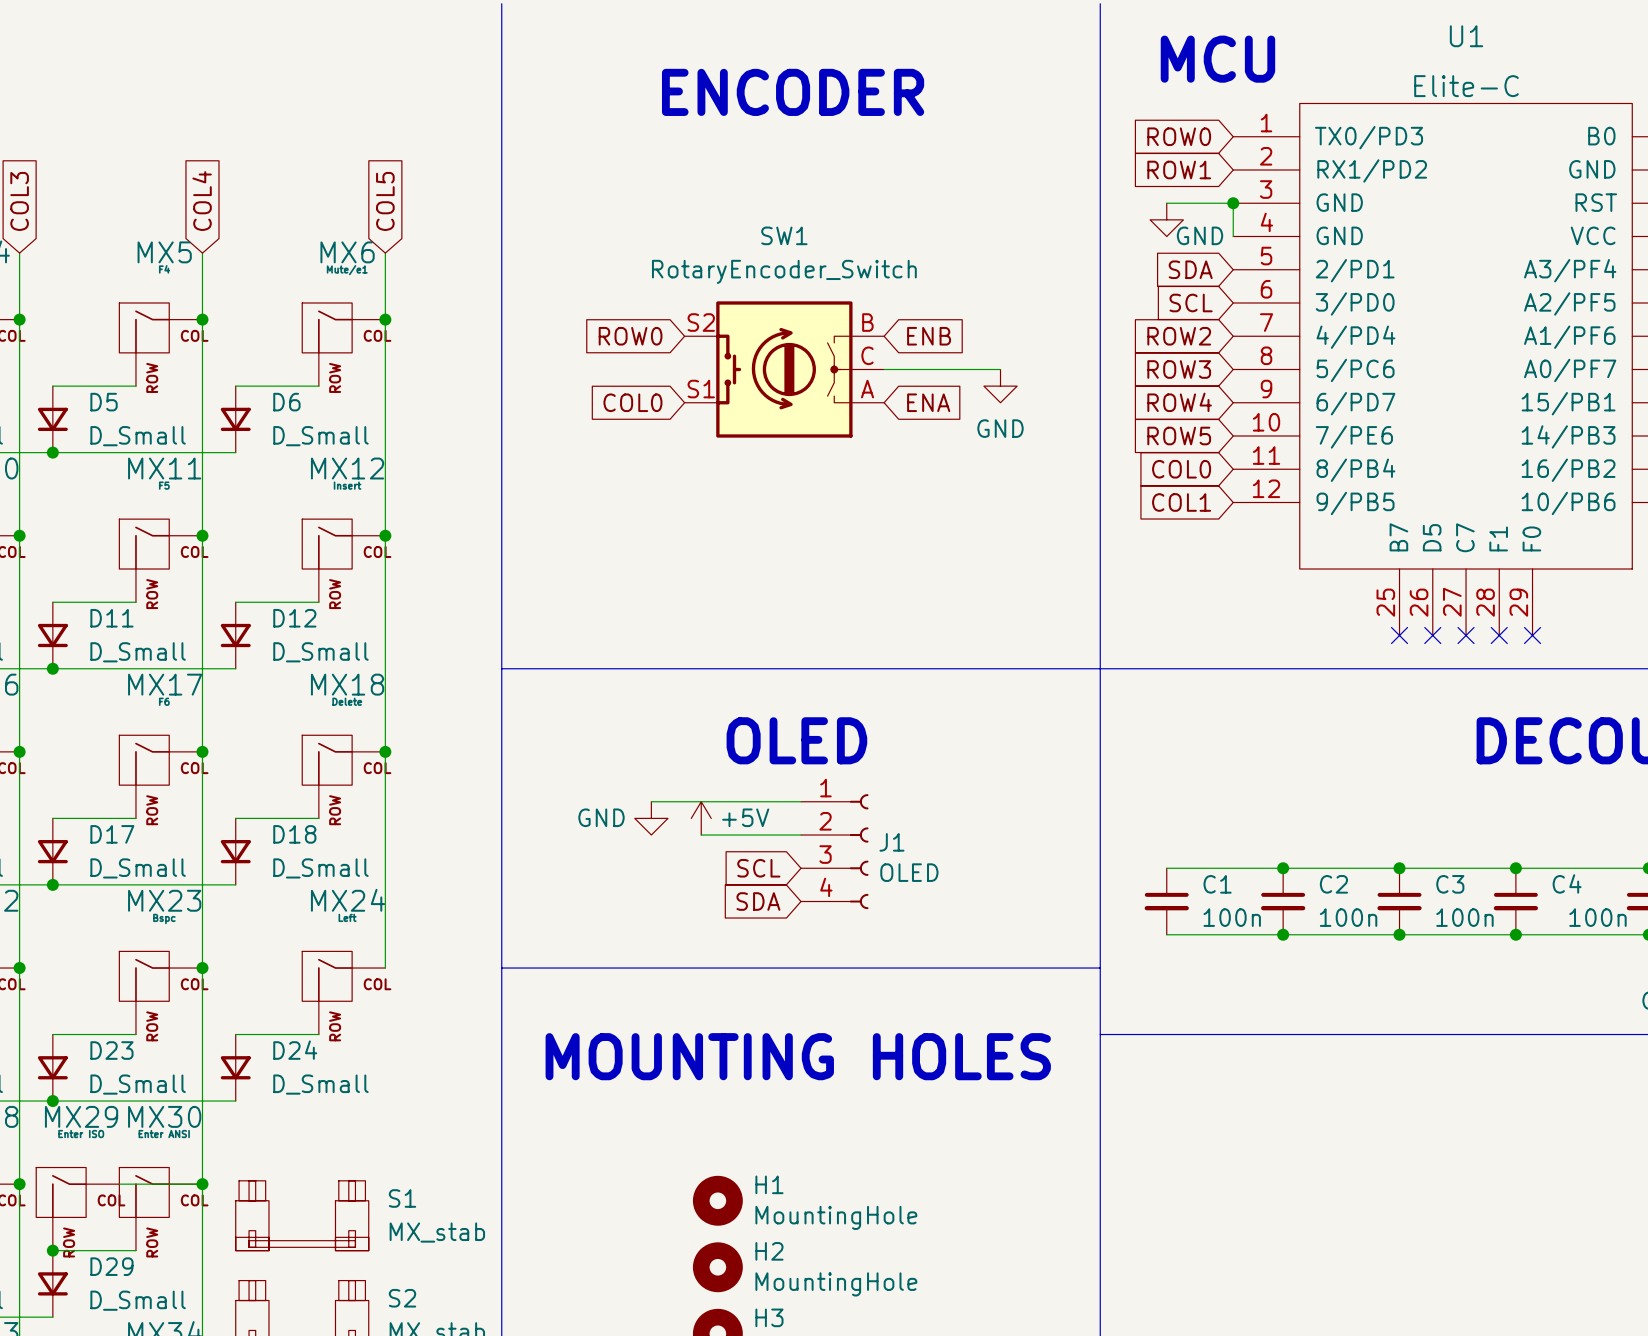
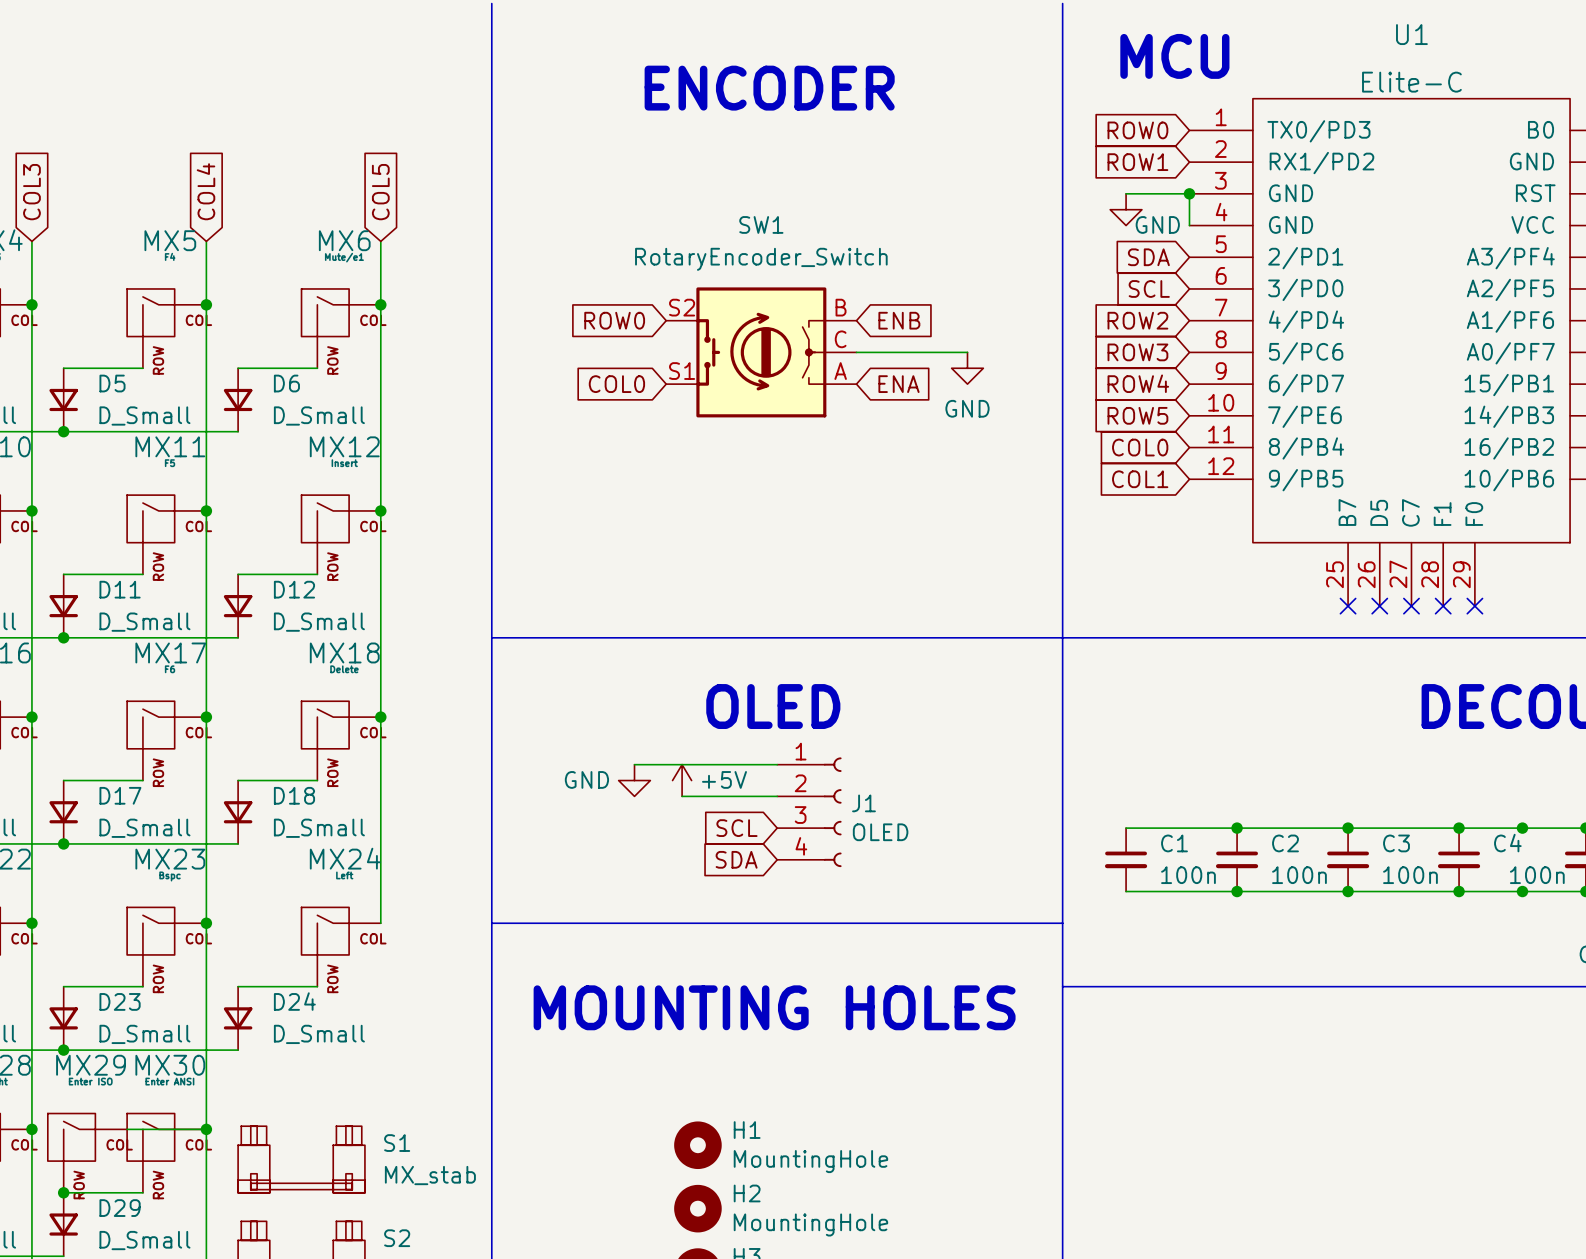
junction: none -> (1522, 828)
junction: none -> (1522, 891)

